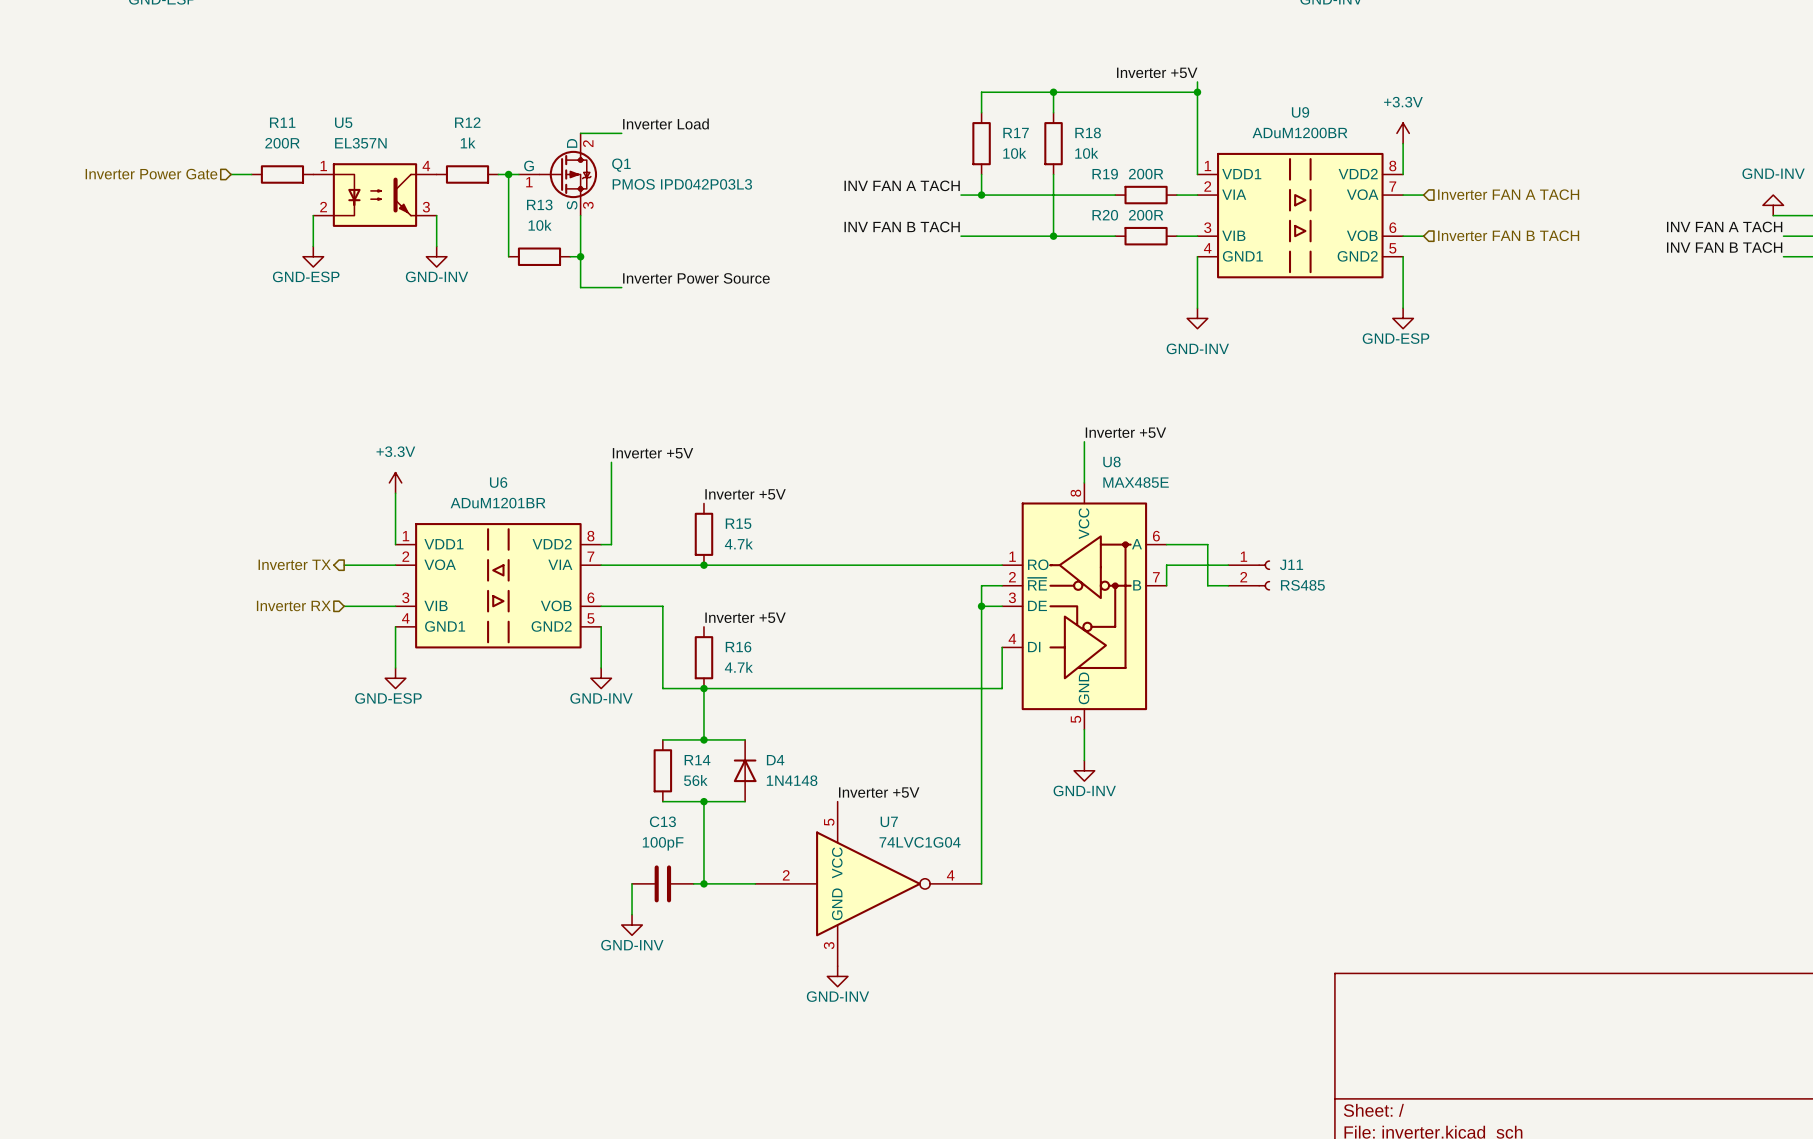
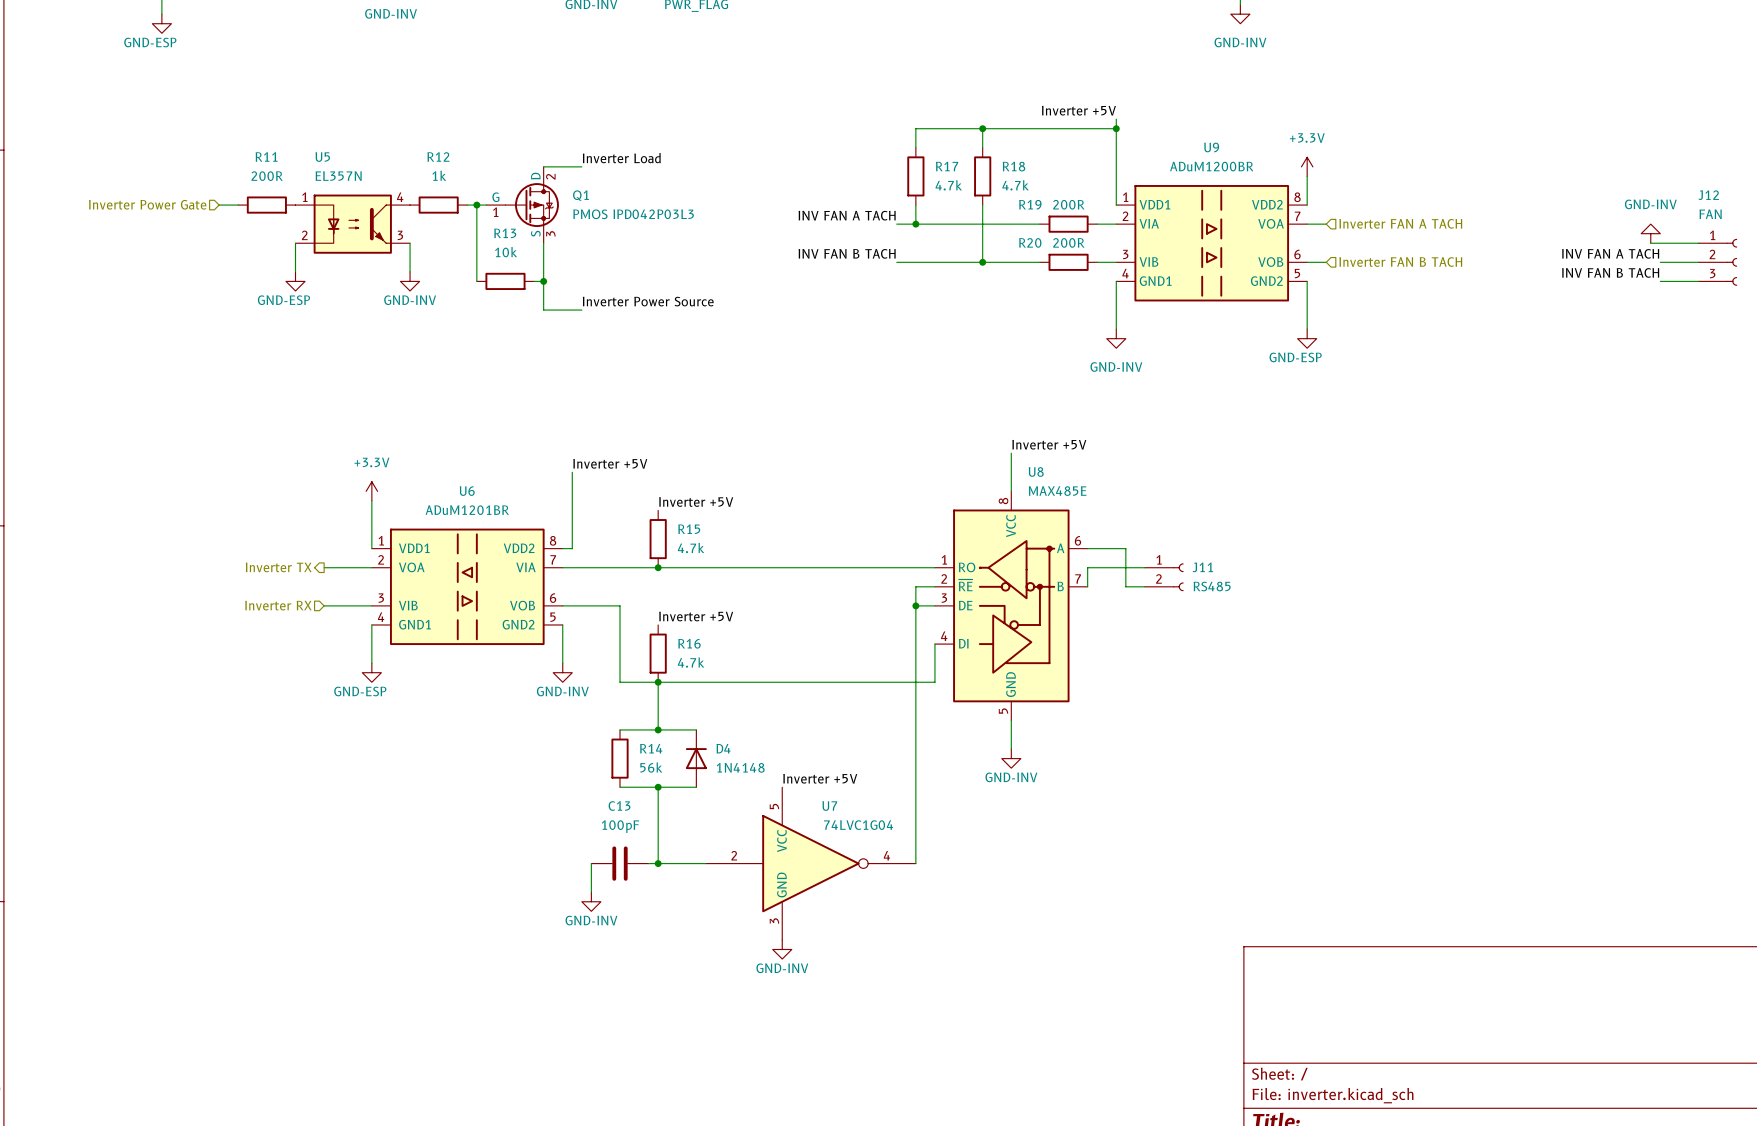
R17 value: 10k (1014, 153) -> 4.7k (948, 185)
R18 value: 10k (1086, 153) -> 4.7k (1015, 185)

